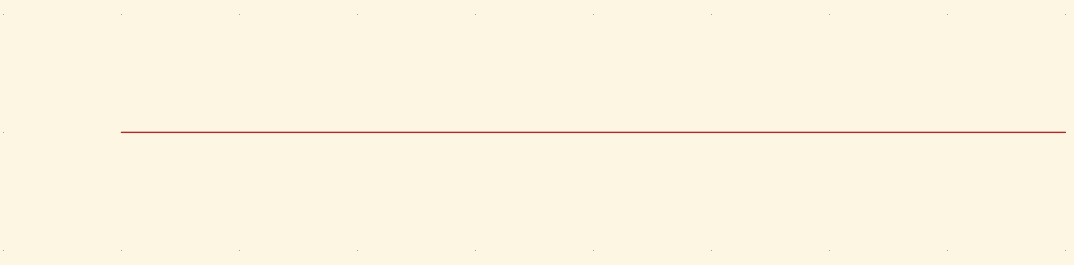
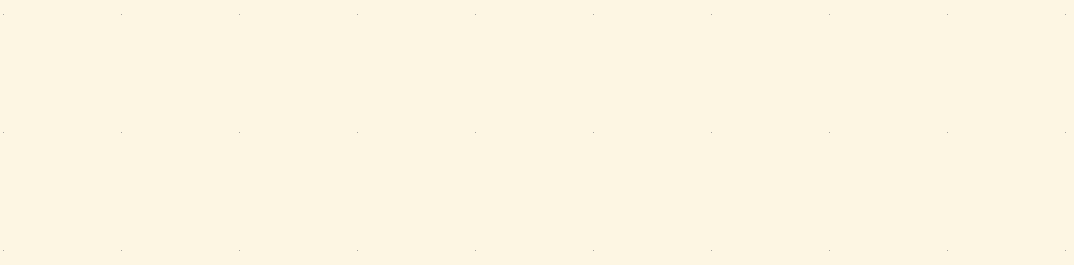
part: (593, 132) -> none

